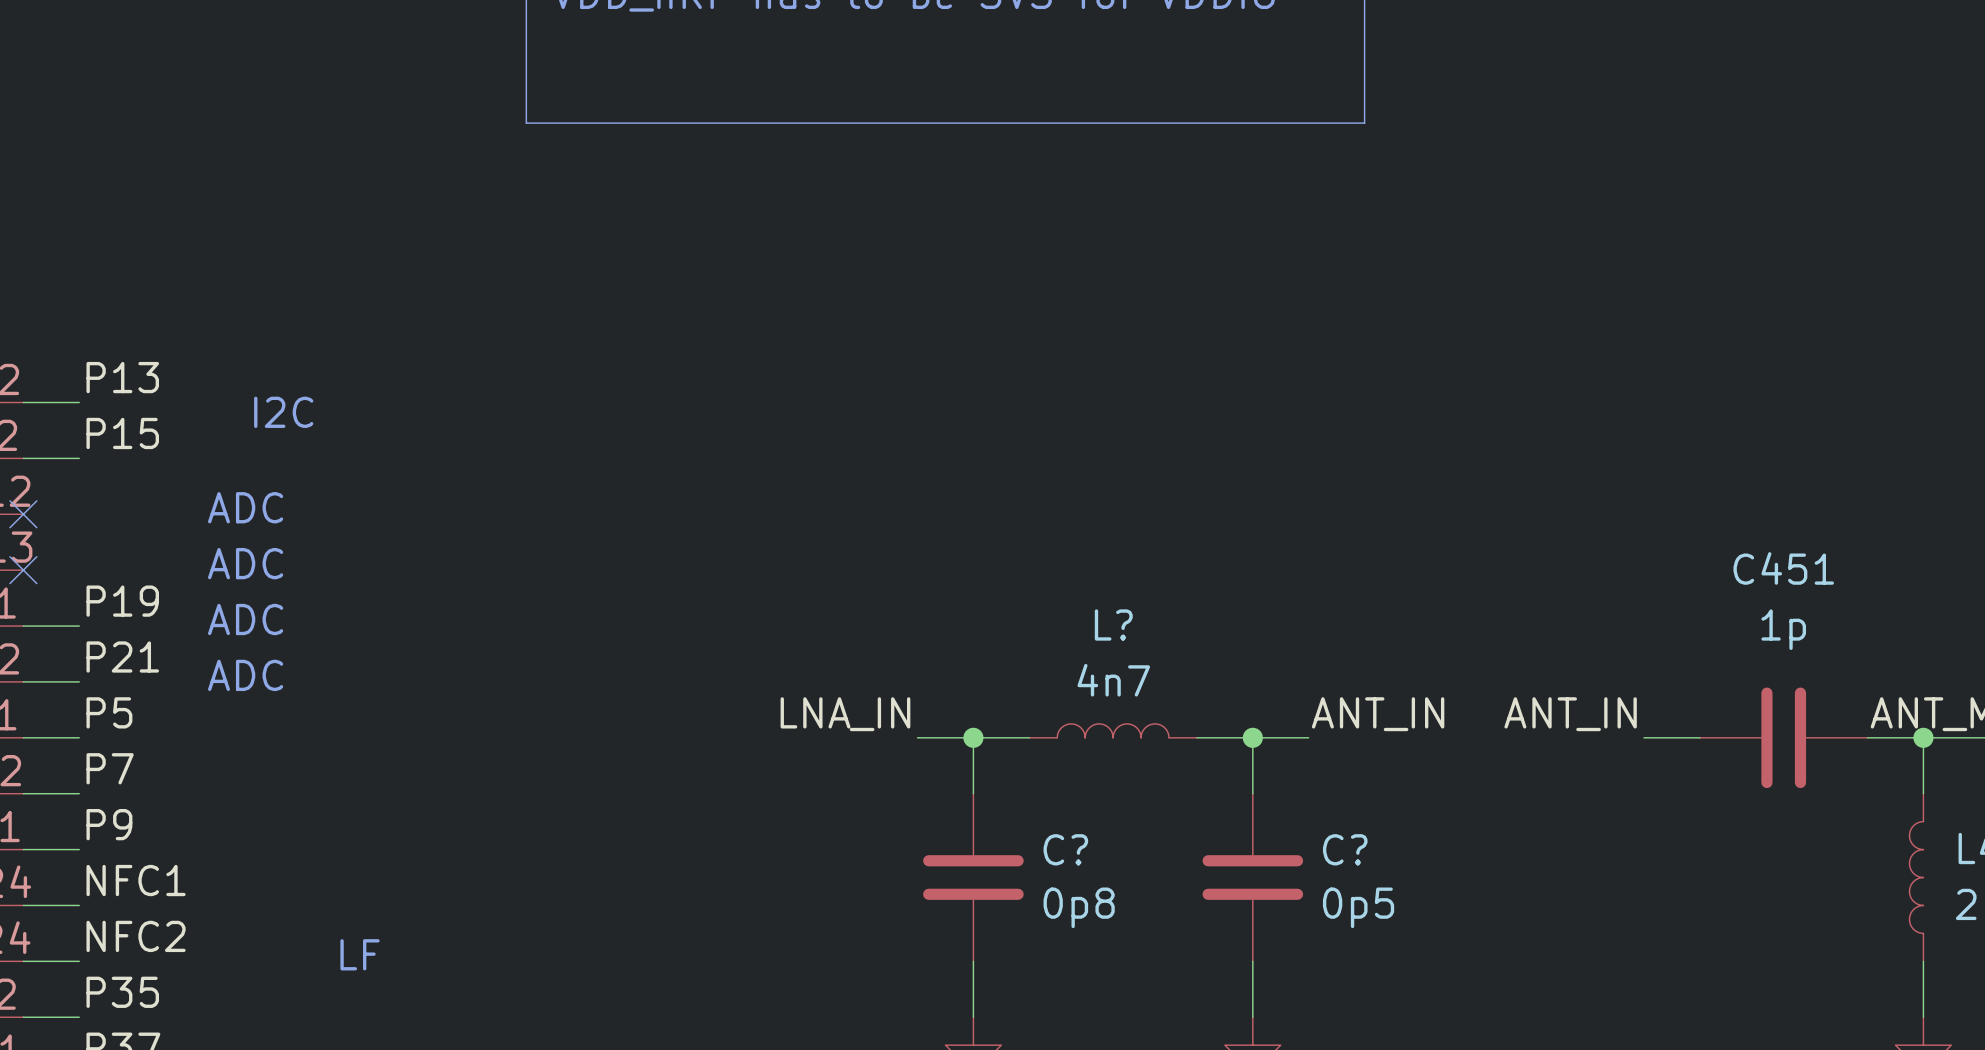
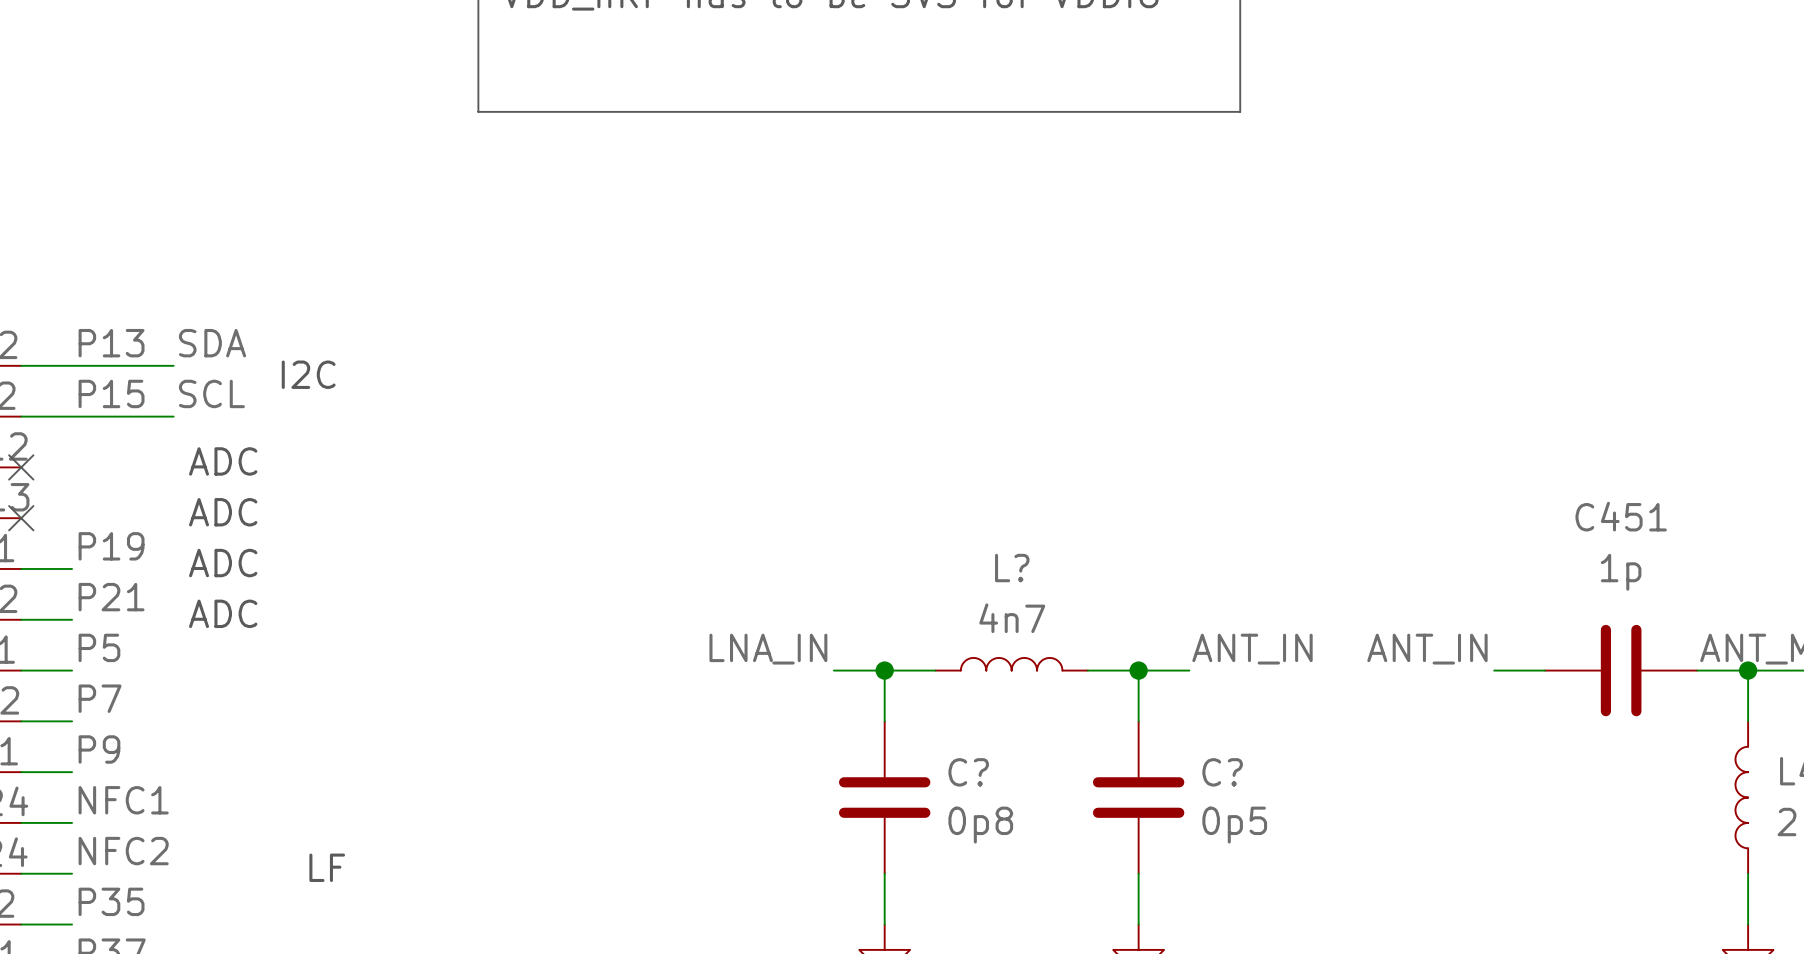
label: none -> SDA (212, 343)
wire: none -> (72, 365) (173, 365)
text position: I2C (283, 412) -> I2C (308, 374)
label: none -> SCL (211, 393)
wire: none -> (72, 416) (173, 416)

